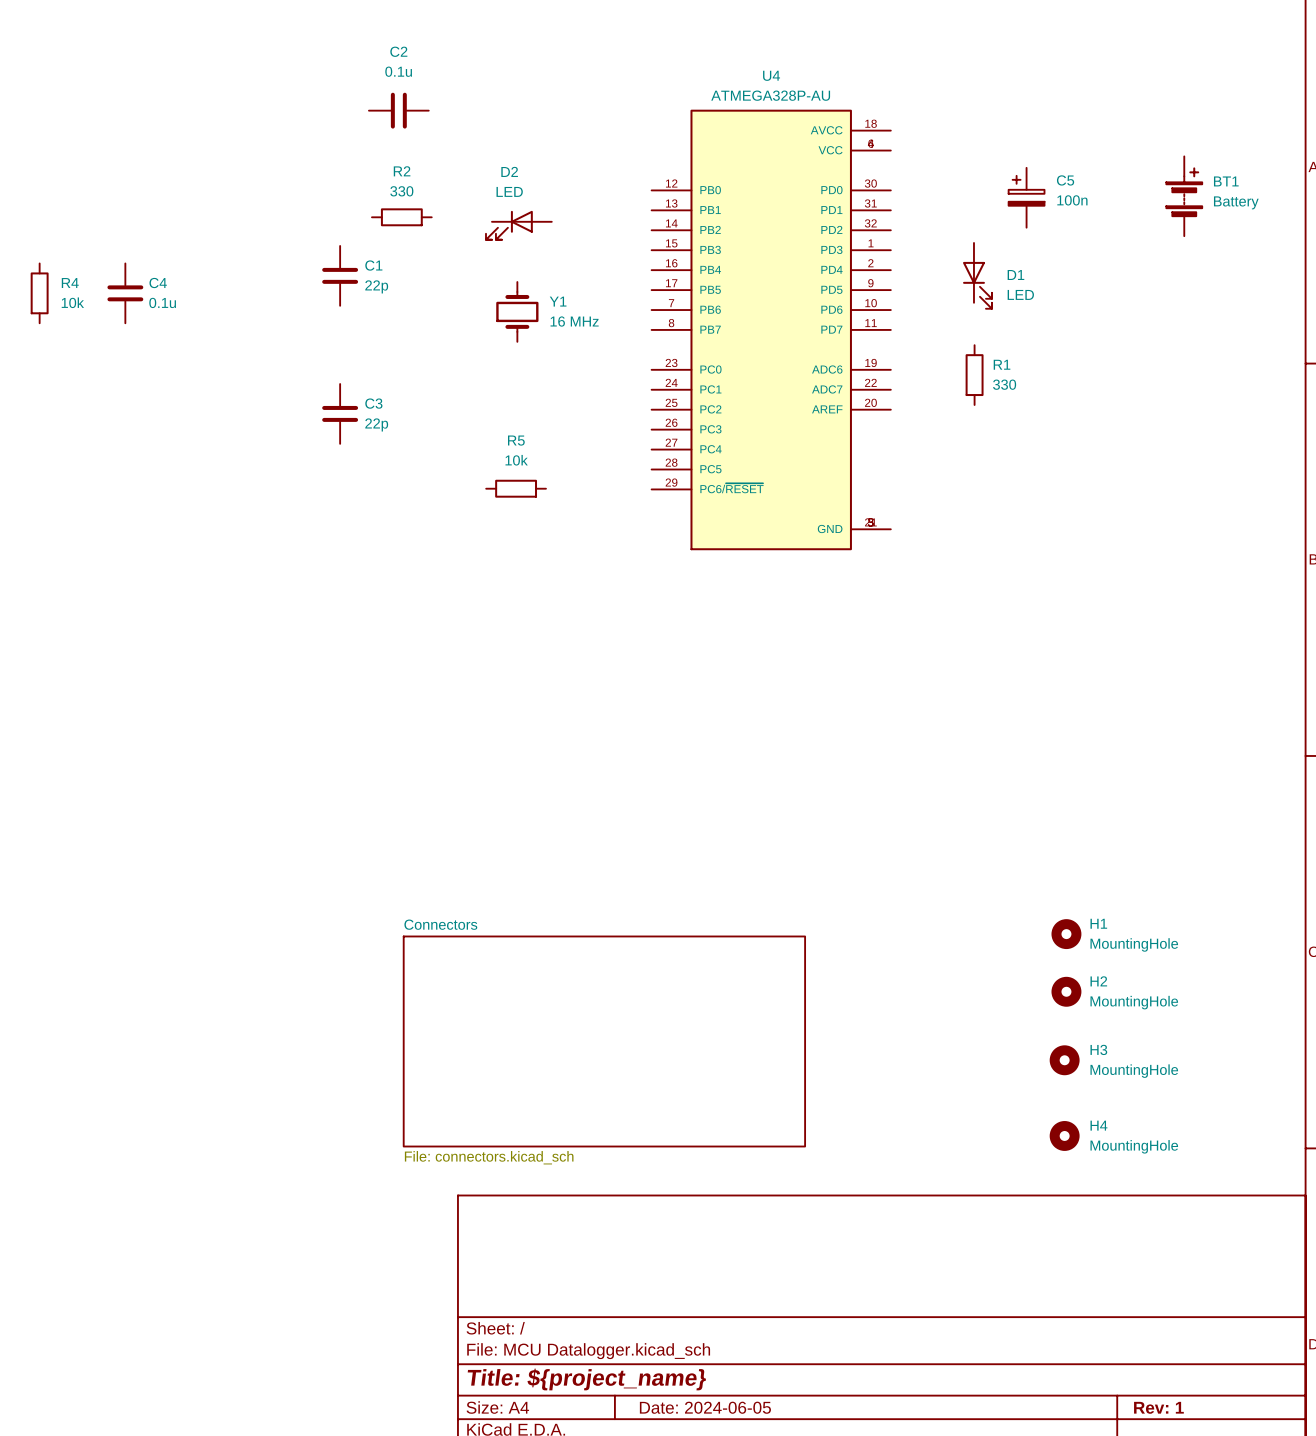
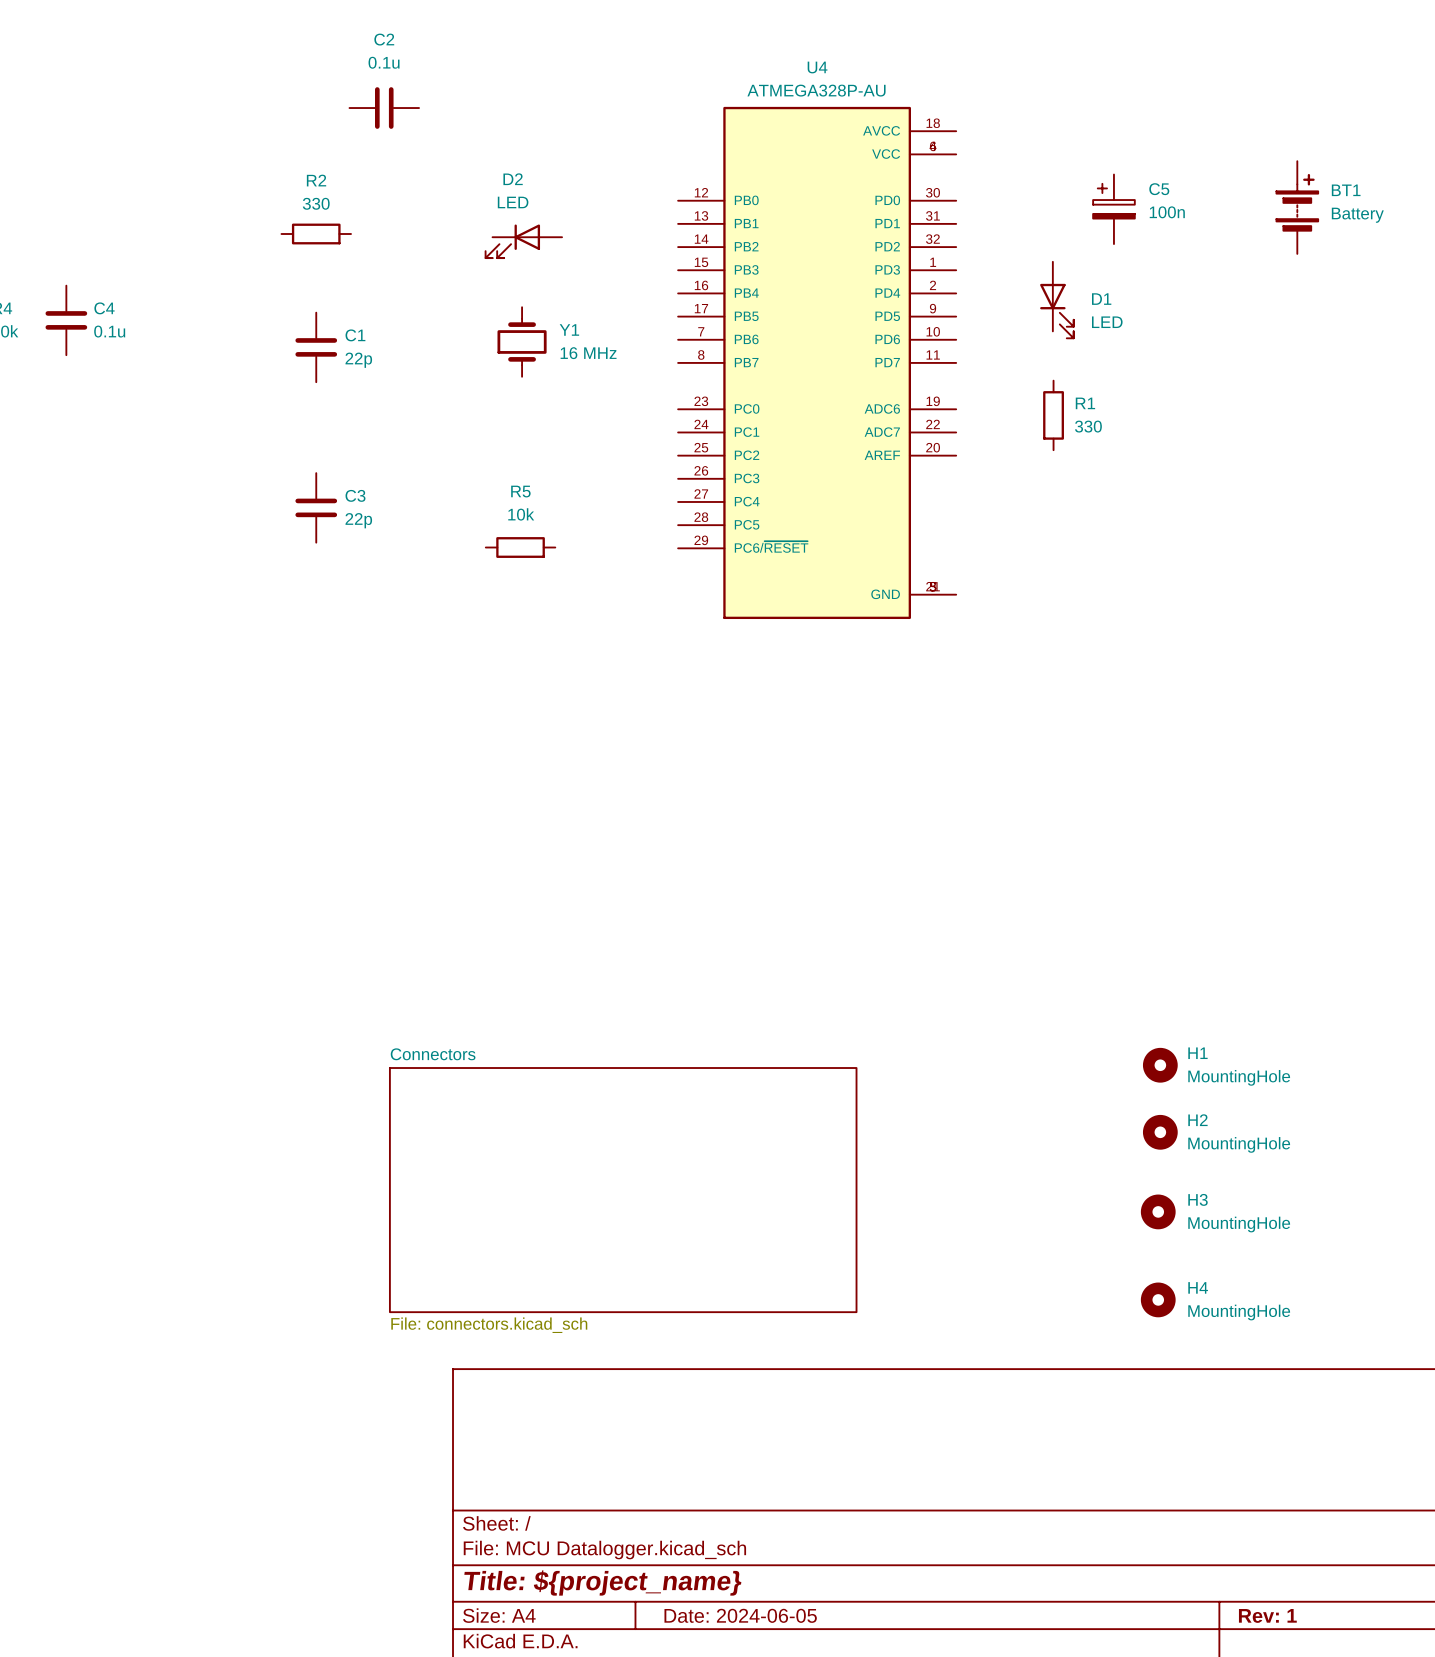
R2 position: (401, 217) -> (316, 234)
C1 position: (340, 275) -> (316, 347)
C3 position: (340, 413) -> (316, 507)

